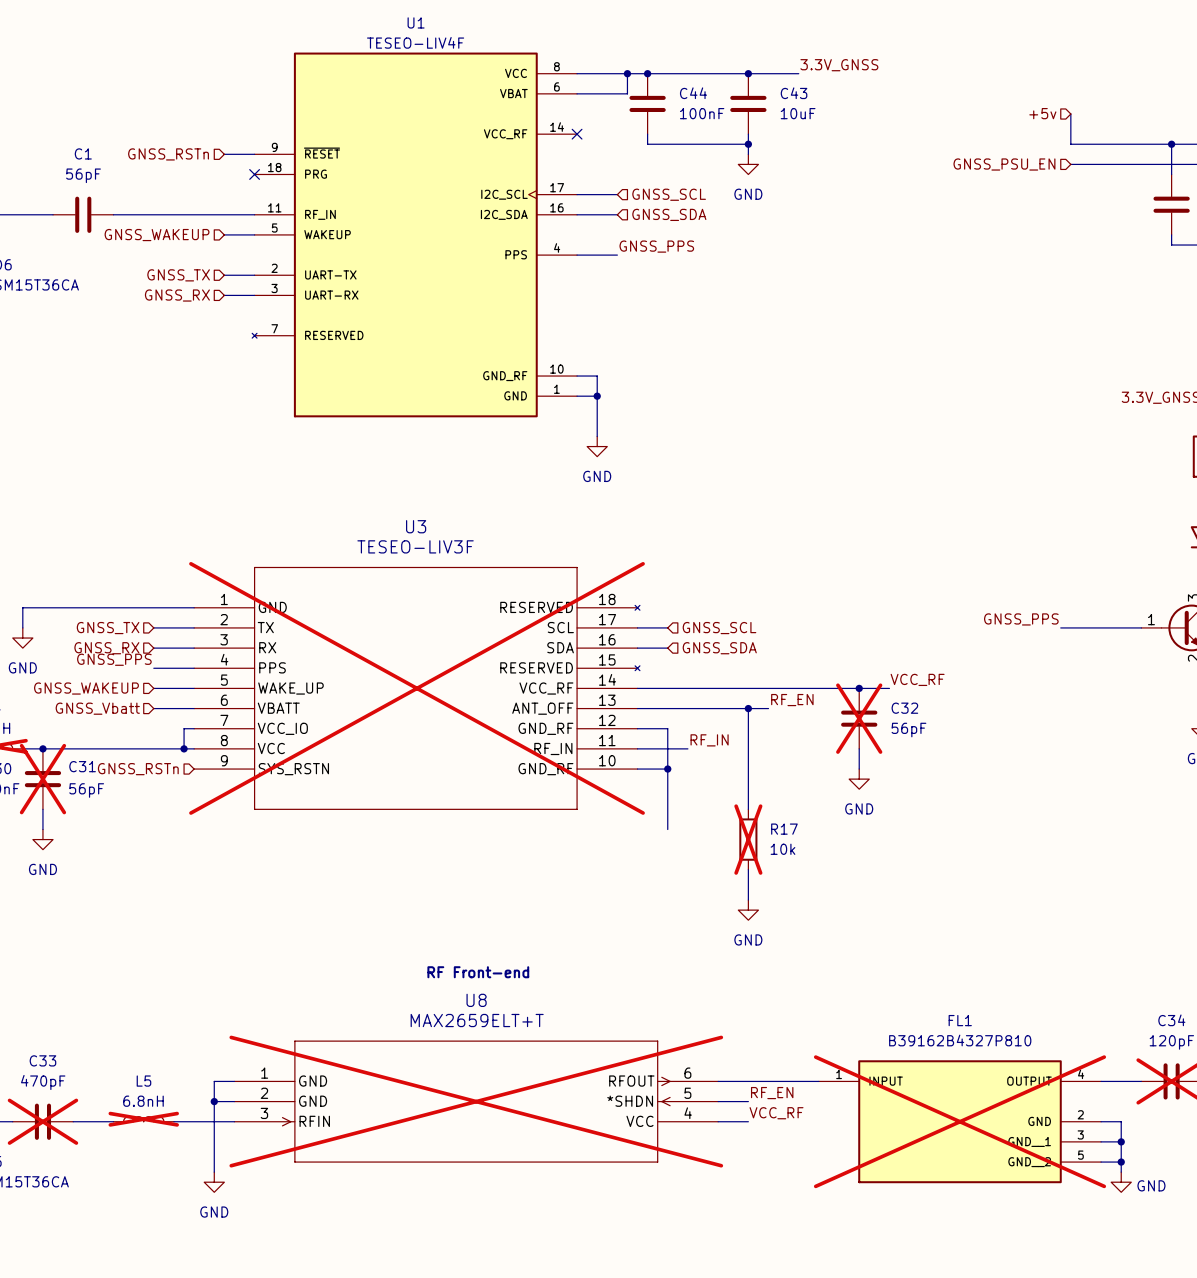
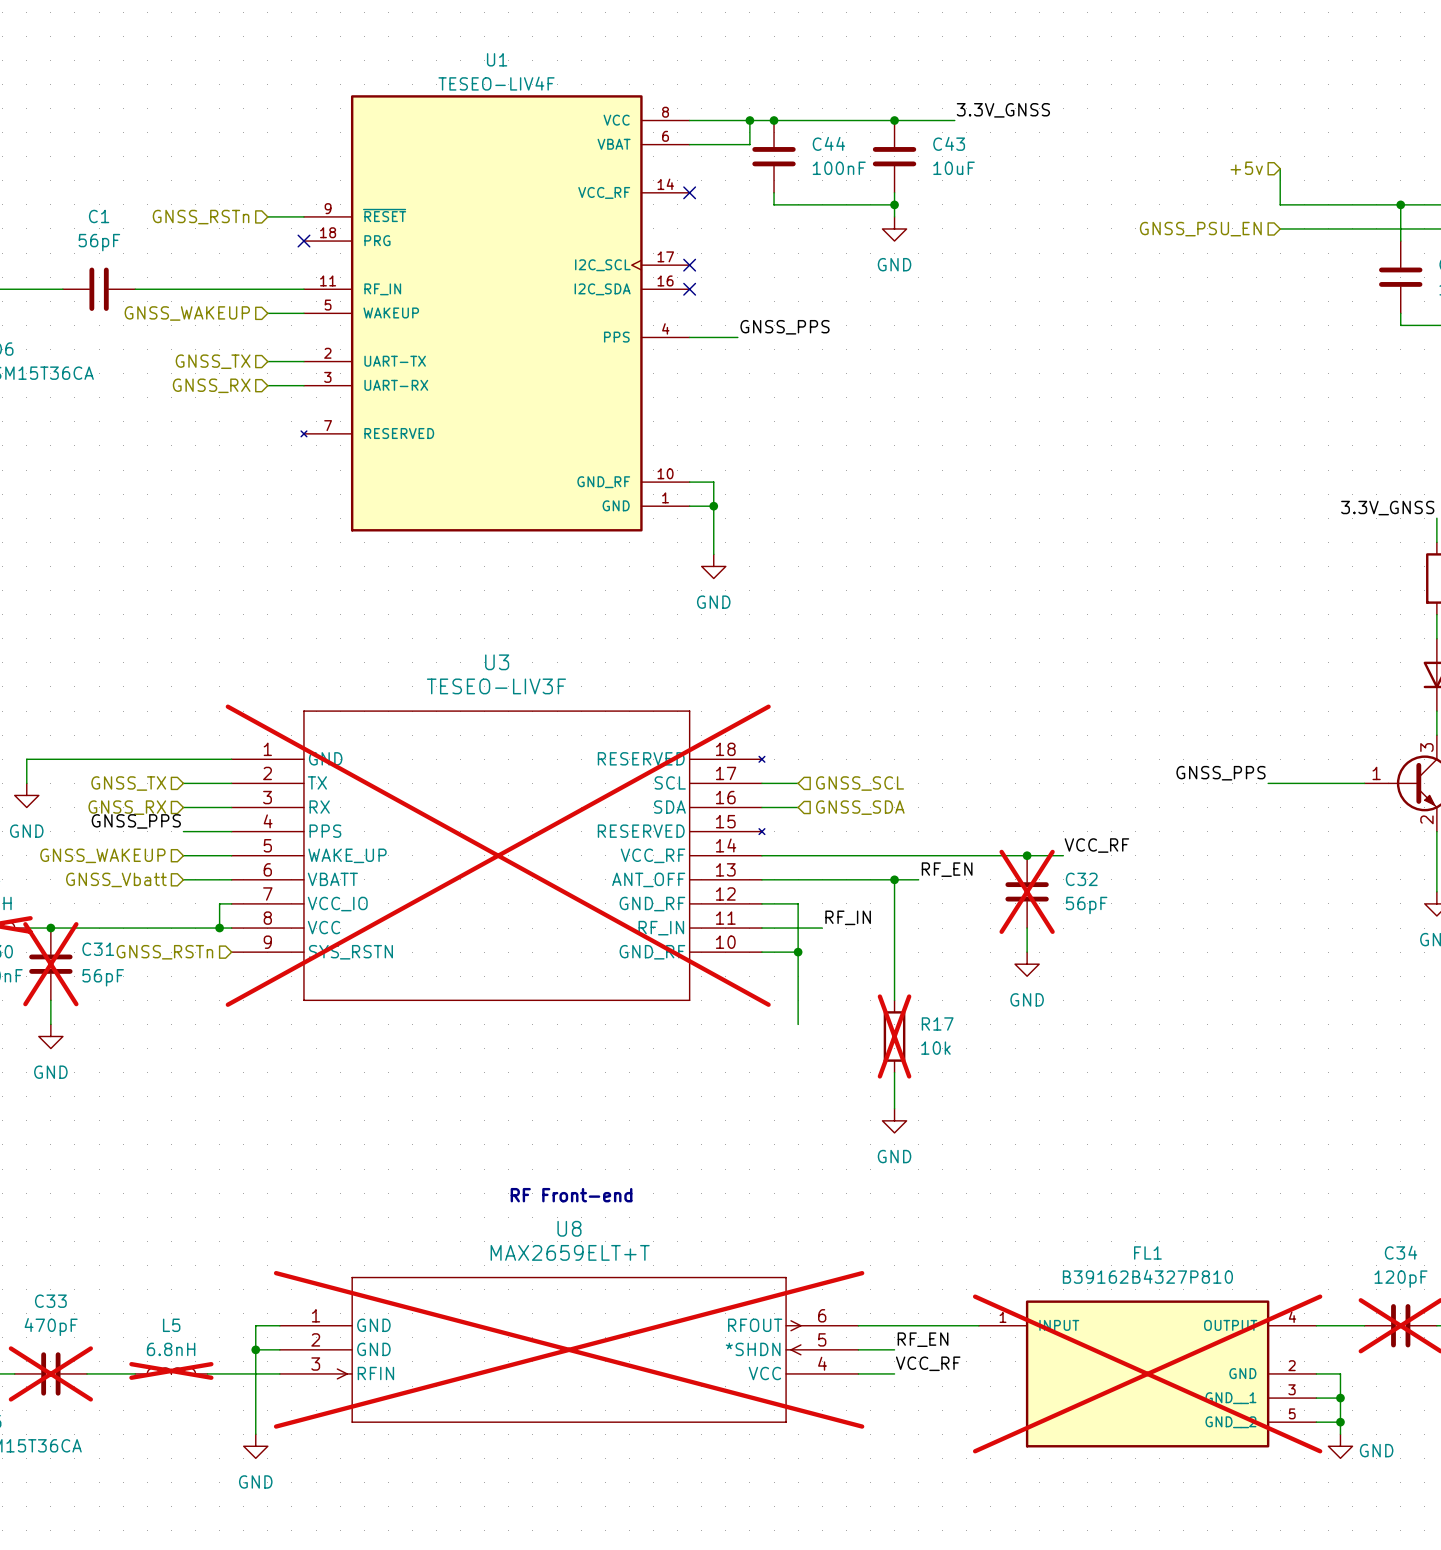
wire: (577, 194) (617, 194) -> none
no-connect mark: none -> (689, 265)
hierarchical label: GNSS_SCL (669, 194) -> none
wire: (577, 214) (617, 214) -> none
no-connect mark: none -> (689, 289)
hierarchical label: GNSS_SDA (669, 214) -> none

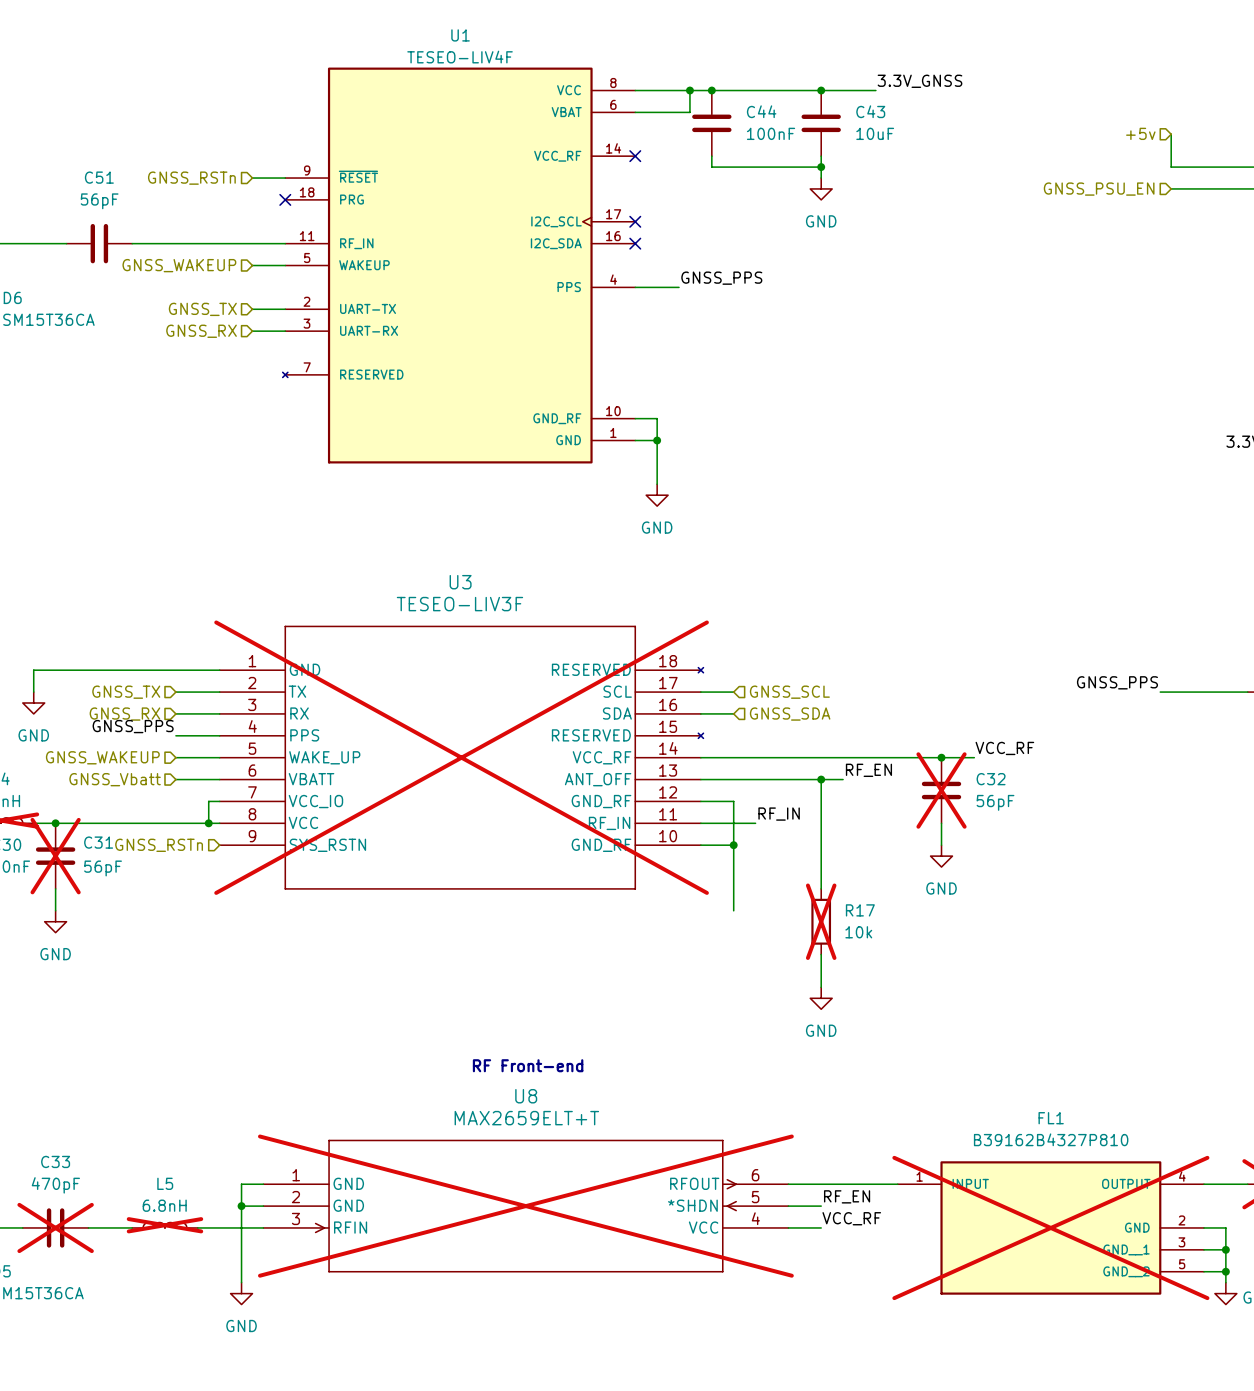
C1 name: C1 (99, 216) -> C51 (99, 177)

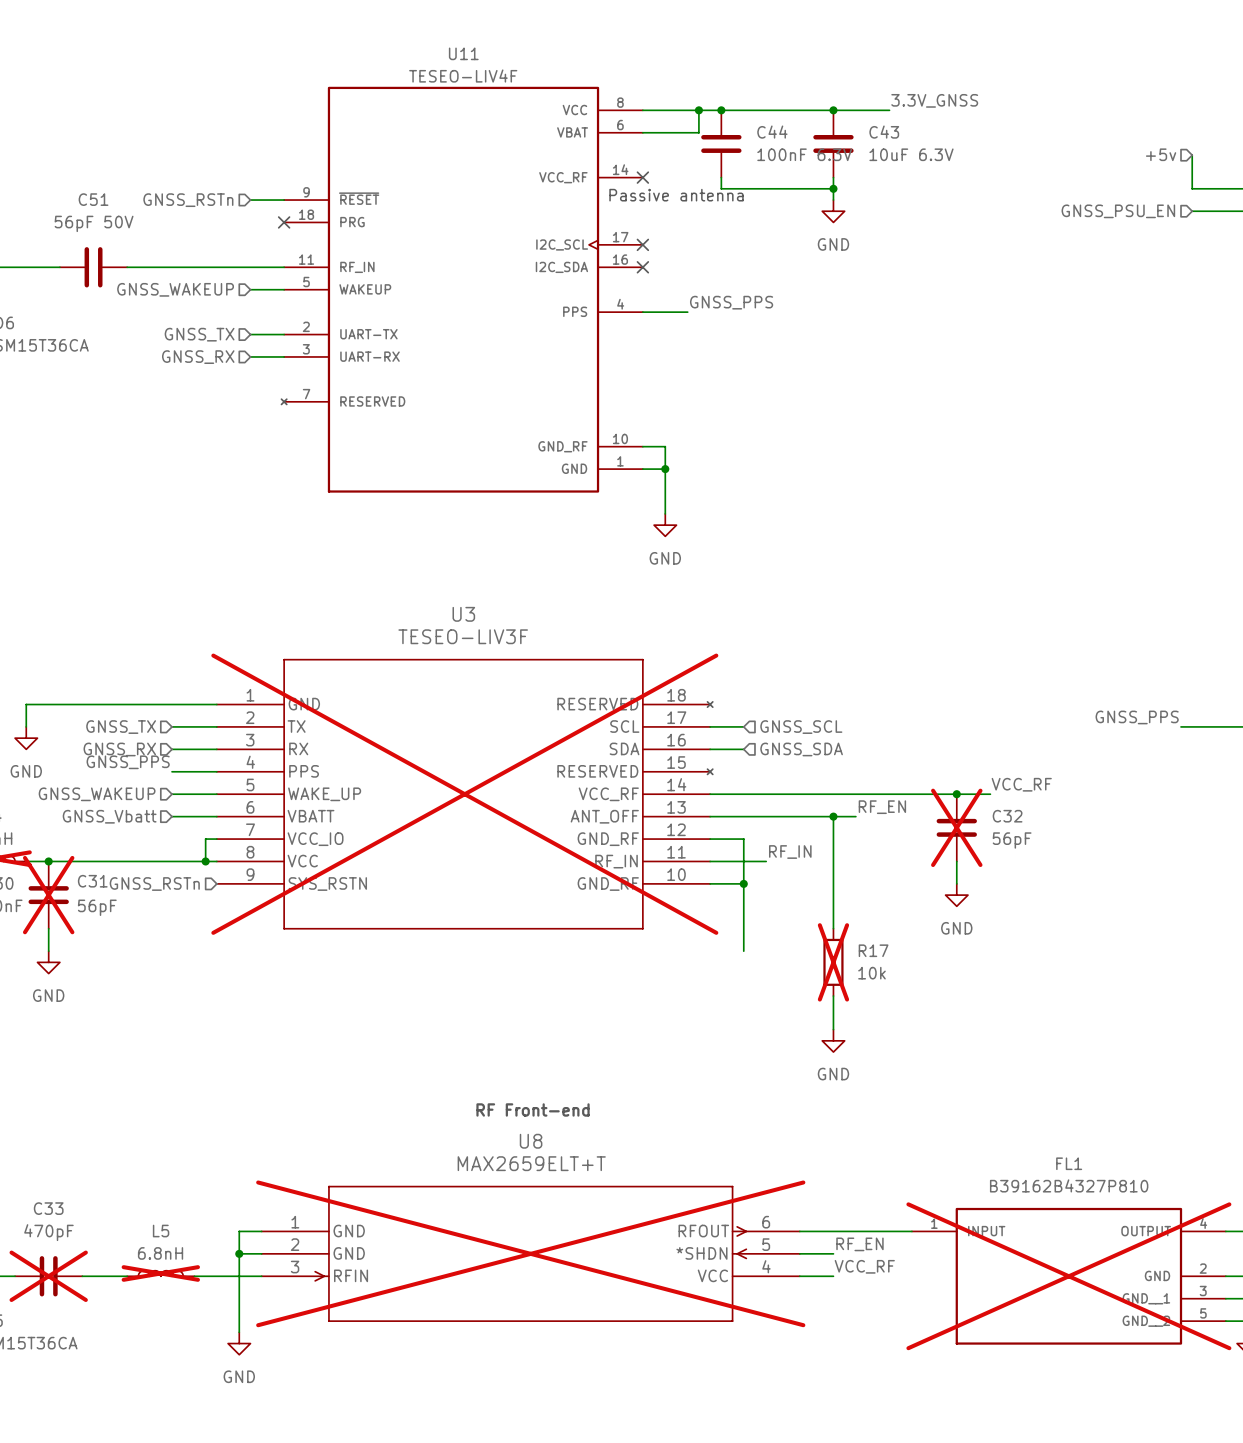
U1 name: U1 (460, 35) -> U11 (463, 53)
C44 value: 100nF (771, 133) -> 100nF 6.3V (804, 154)
C43 value: 10uF (875, 133) -> 10uF 6.3V (911, 154)
text: none -> Passive antenna (676, 195)
C51 value: 56pF (99, 201) -> 56pF 50V (94, 223)

